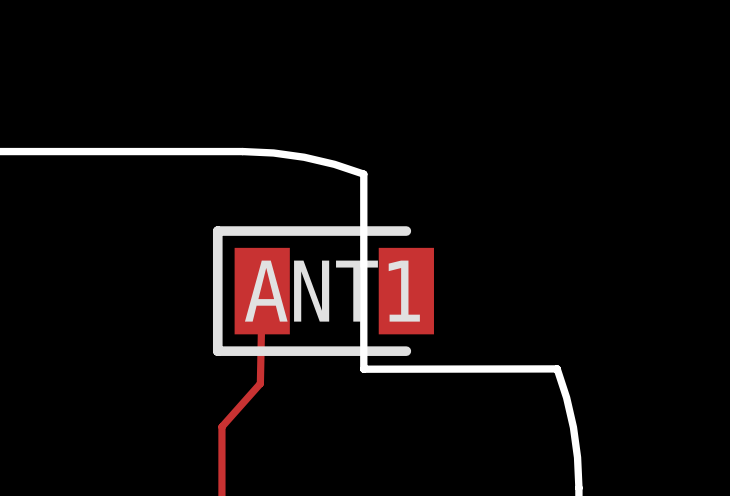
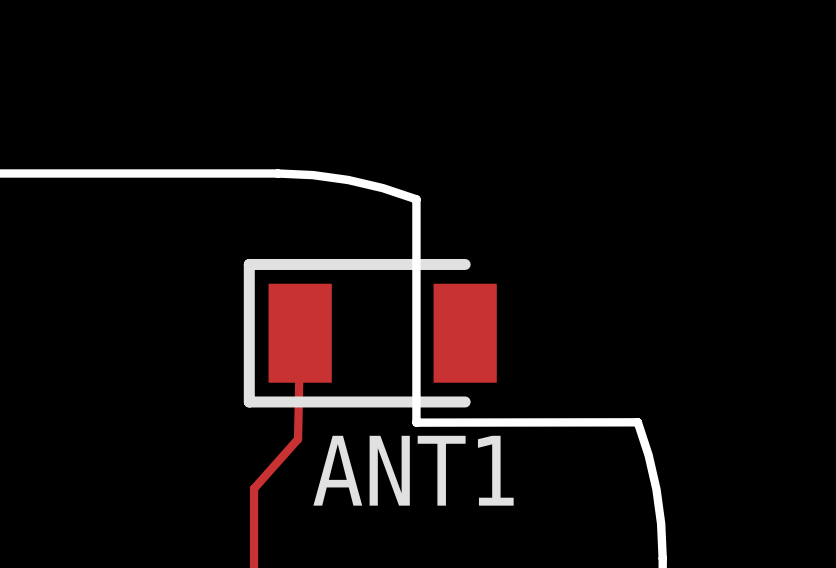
ANT1 name position: ANT1 (332, 291) -> ANT1 (413, 470)

